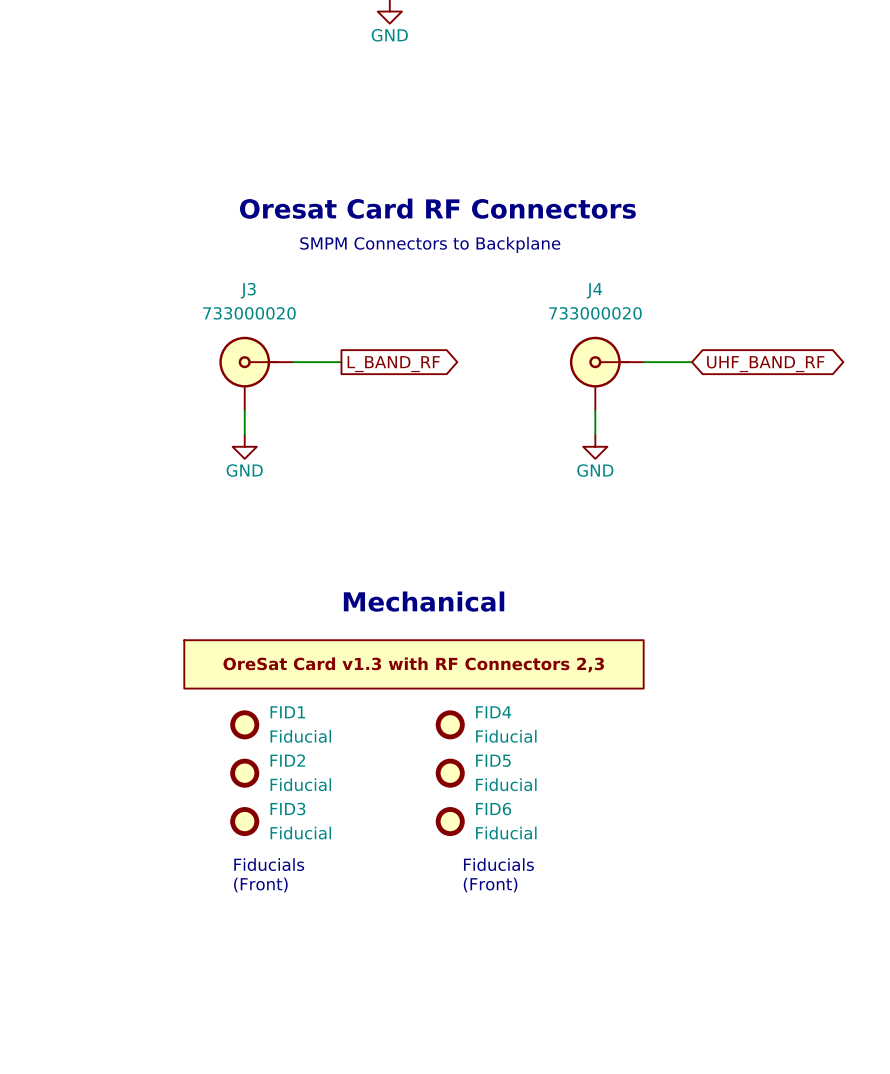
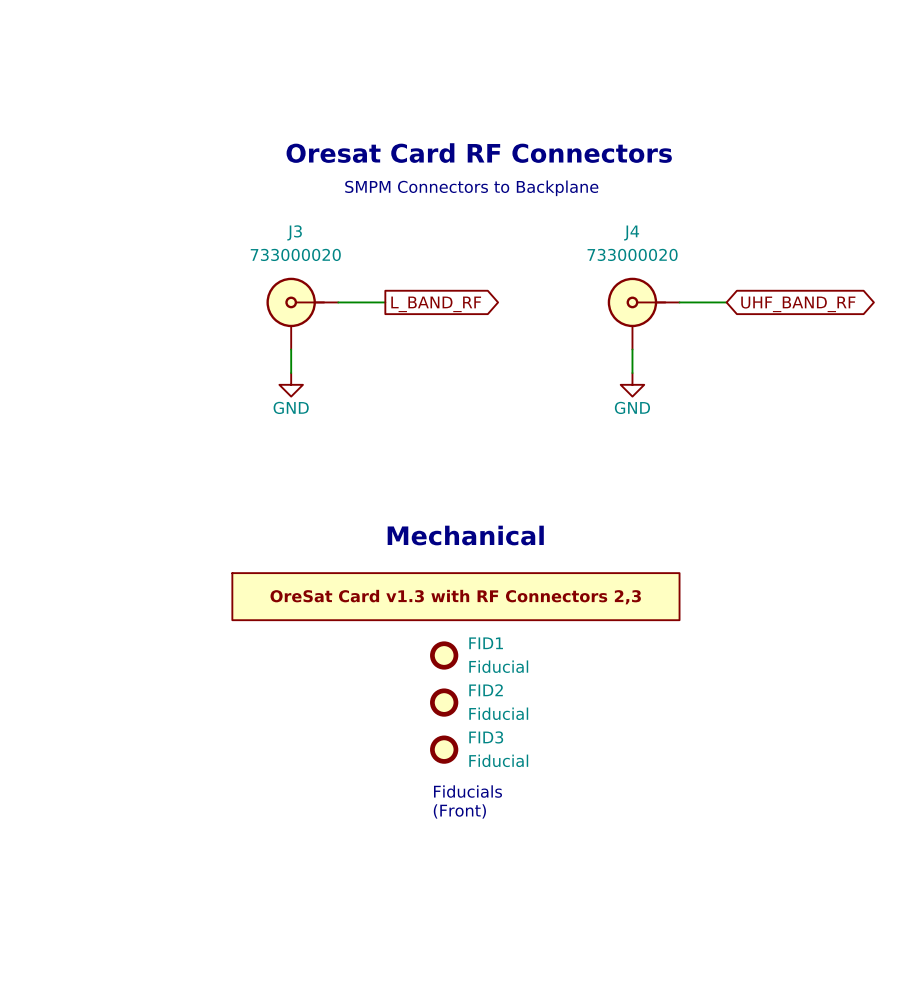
FID1 position: (244, 724) -> (444, 655)
FID4: Fiducial (450, 724) -> none
FID2 position: (244, 773) -> (444, 702)
FID5: Fiducial (450, 773) -> none
FID3 position: (244, 821) -> (444, 749)
FID6: Fiducial (450, 821) -> none
text: Fiducials (269, 864) -> none
text position: Fiducials (498, 864) -> Fiducials (468, 791)
text: (Front) (260, 885) -> none
text position: (Front) (490, 885) -> (Front) (459, 811)

